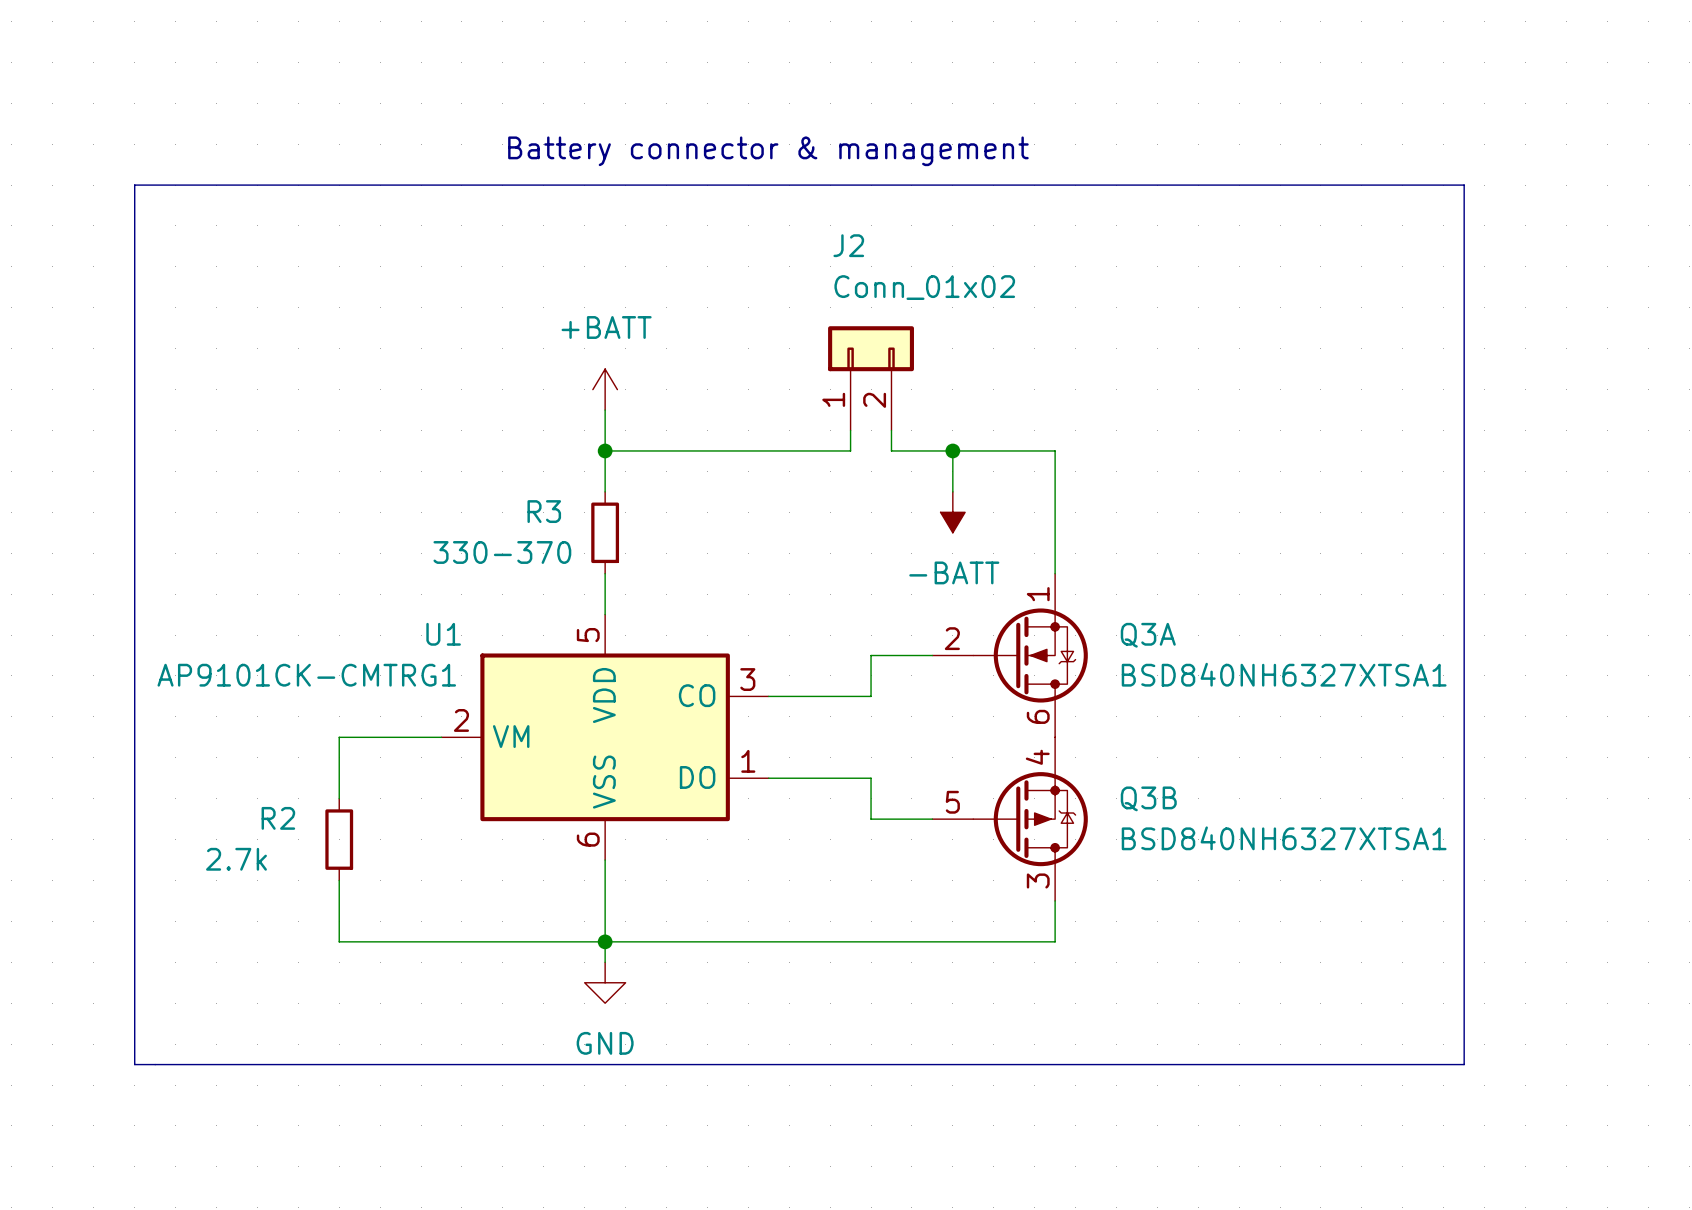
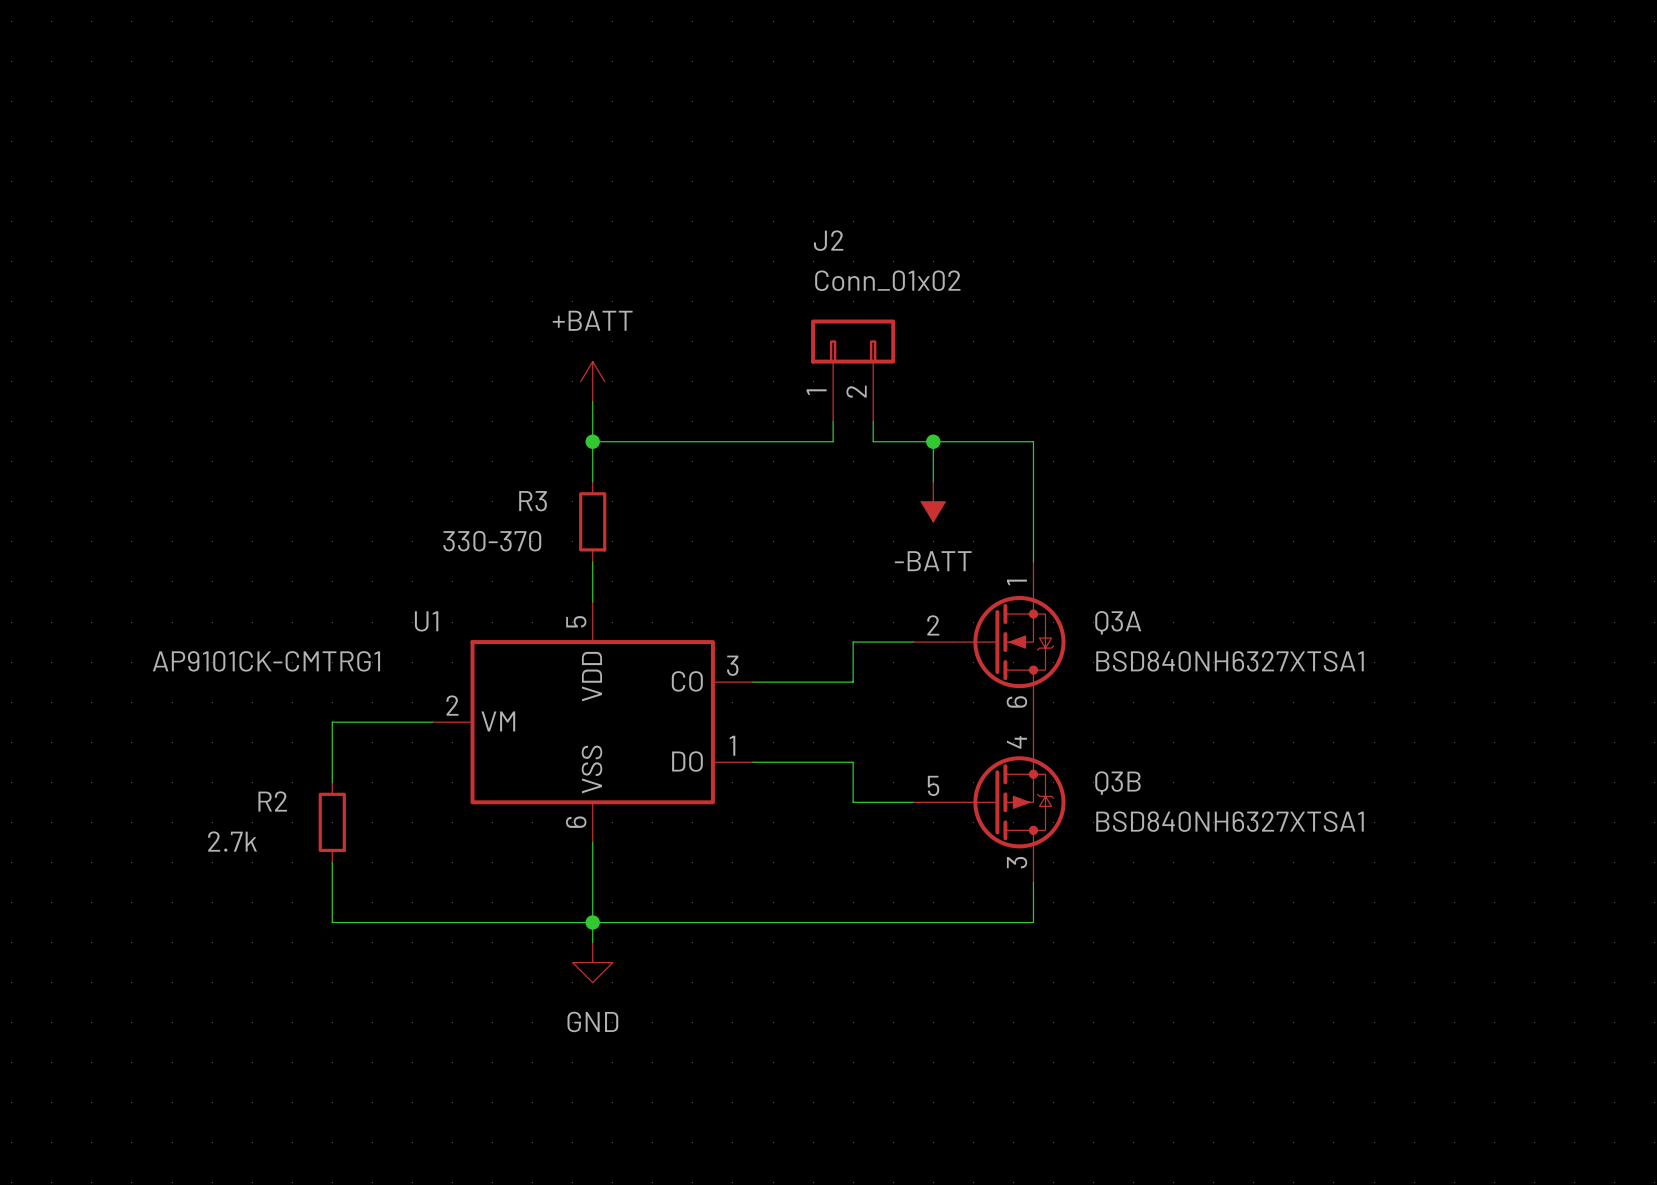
text: Battery connector & management (768, 151) -> none
line: (134, 185) (1464, 185) (1464, 1064) (134, 1064) (134, 185) -> none

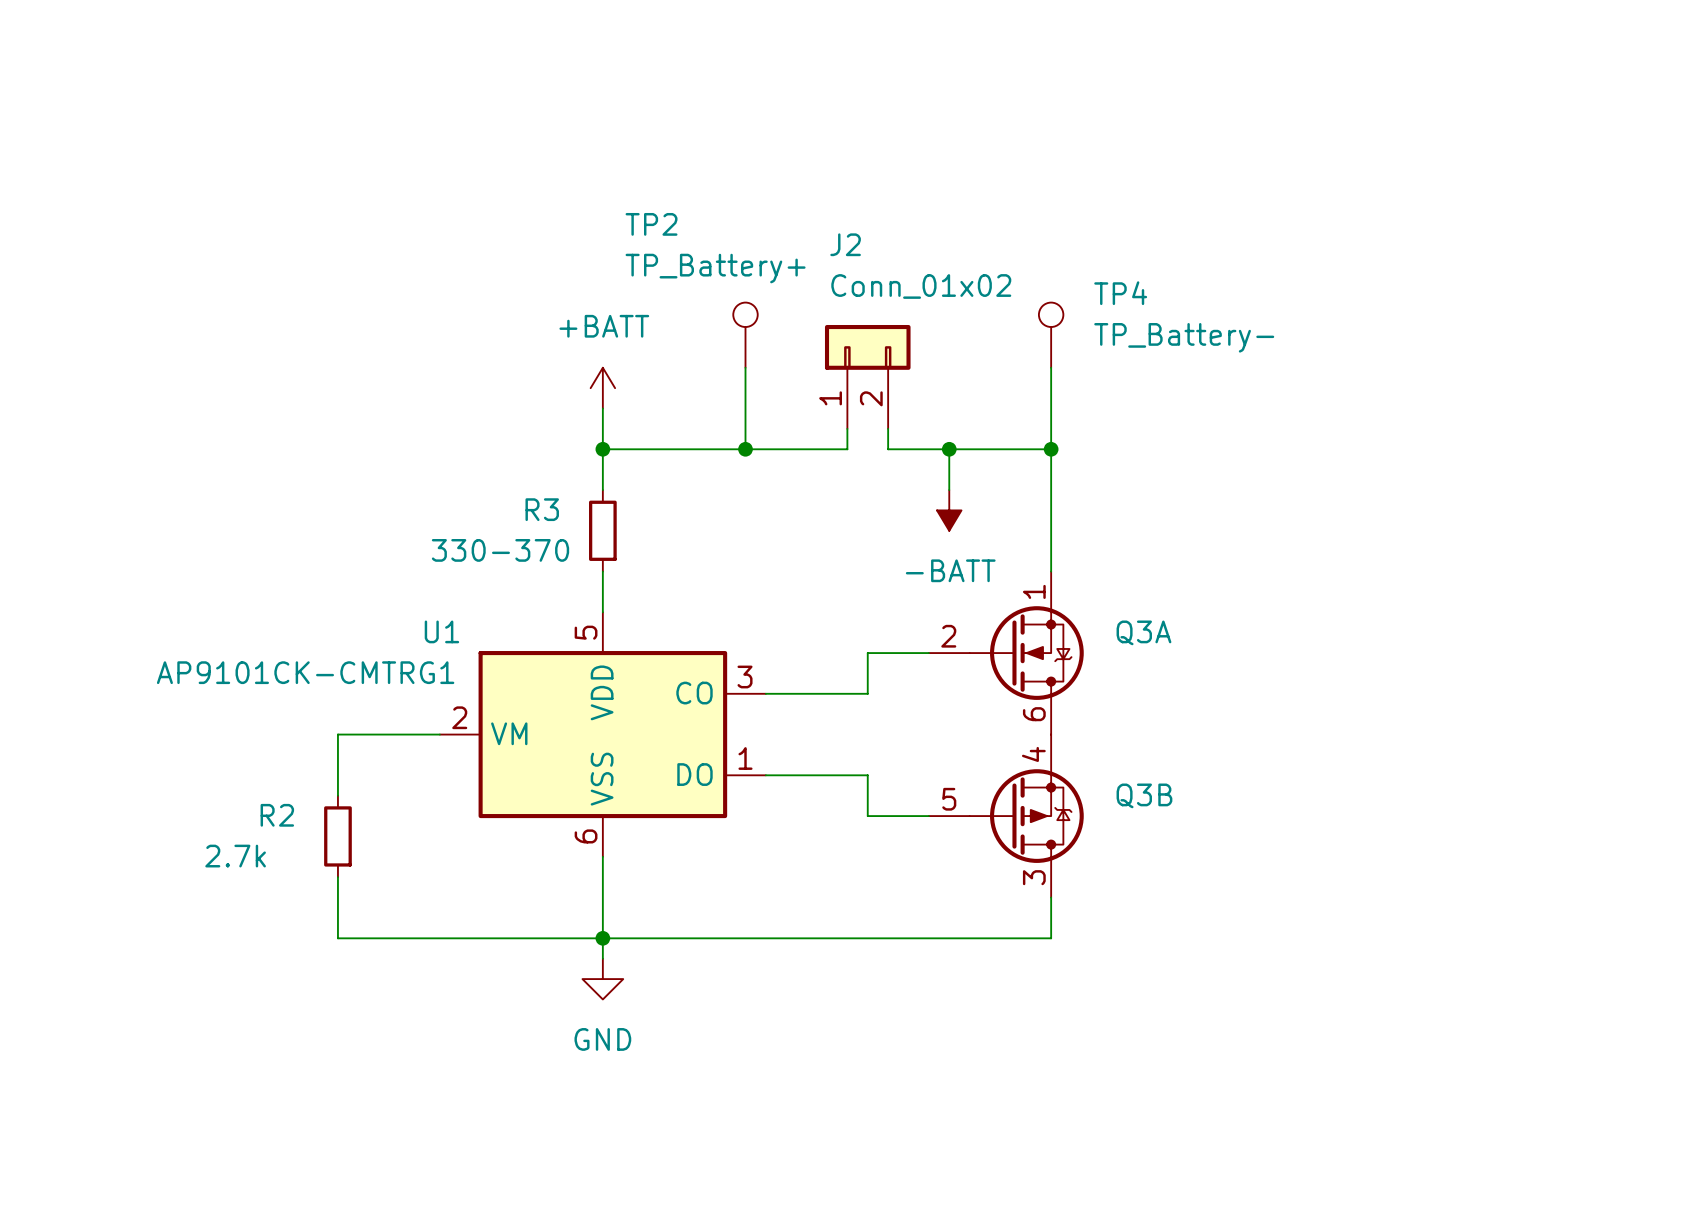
TP2: none -> TP_Battery+ (745, 335)
TP4: none -> TP_Battery- (1051, 335)
wire: none -> (745, 367) (745, 449)
wire: none -> (1051, 367) (1051, 449)
junction: none -> (745, 449)
junction: none -> (1051, 449)
Q3A value: BSD840NH6327XTSA1 (1230, 661) -> none
Q3B value: BSD840NH6327XTSA1 (1230, 821) -> none

